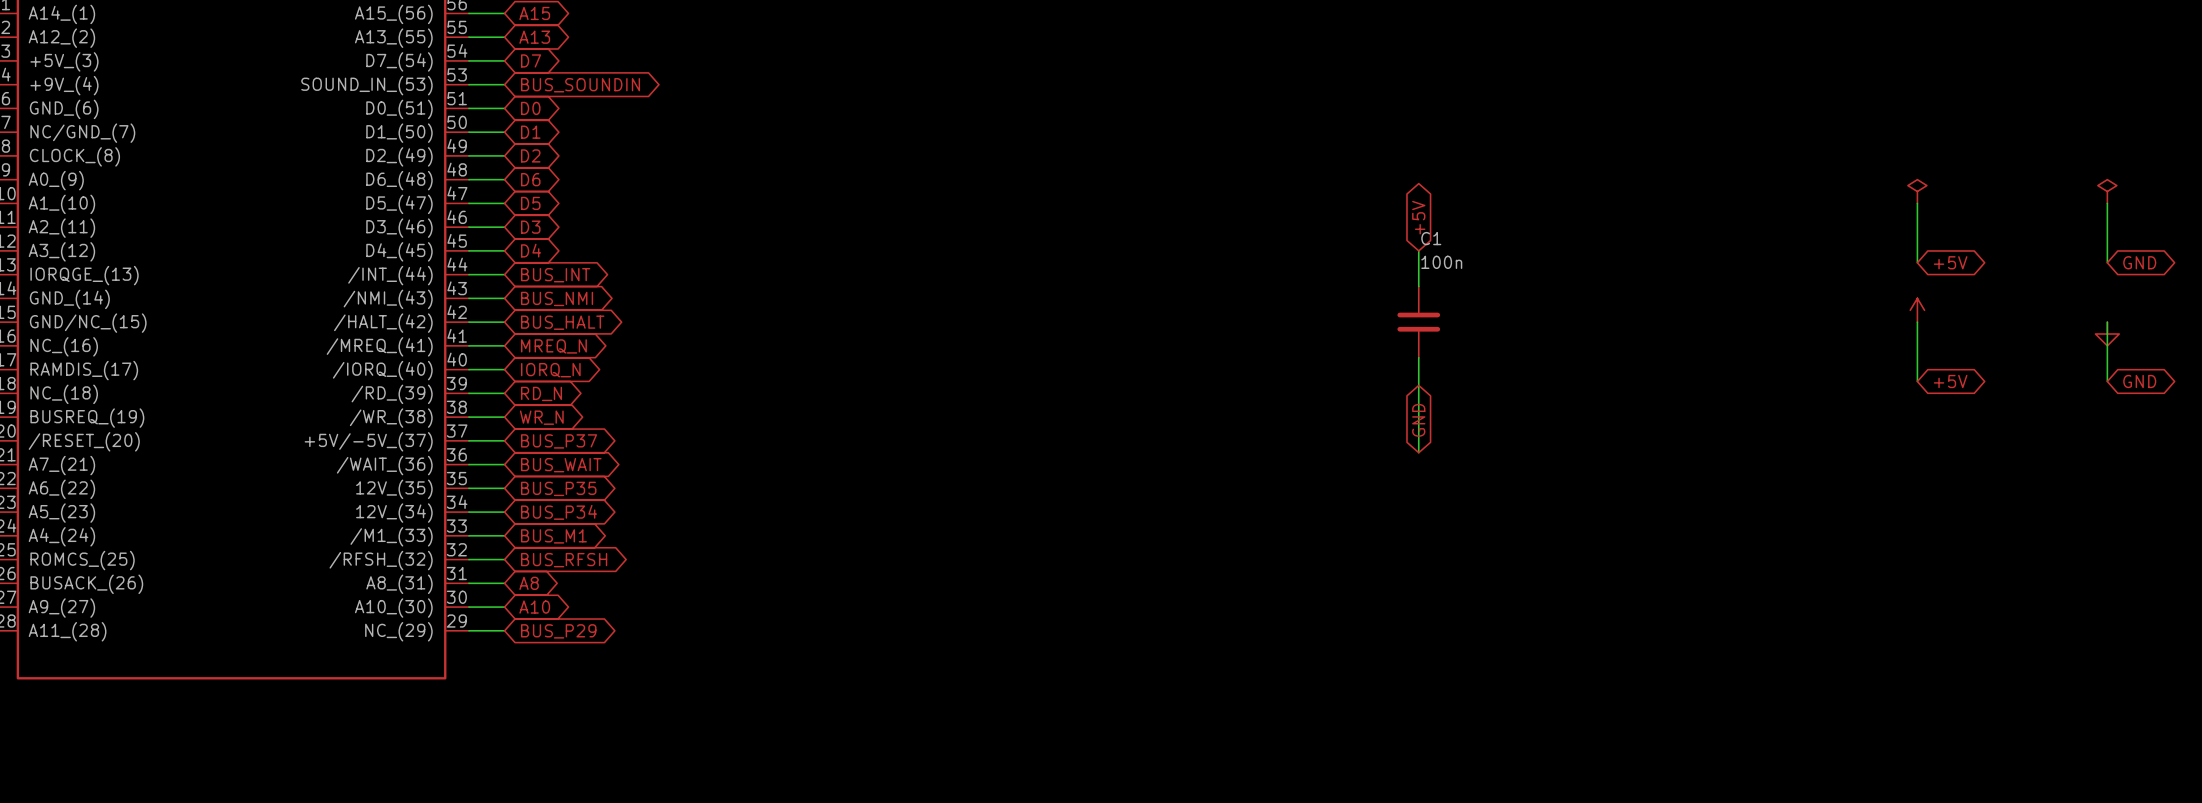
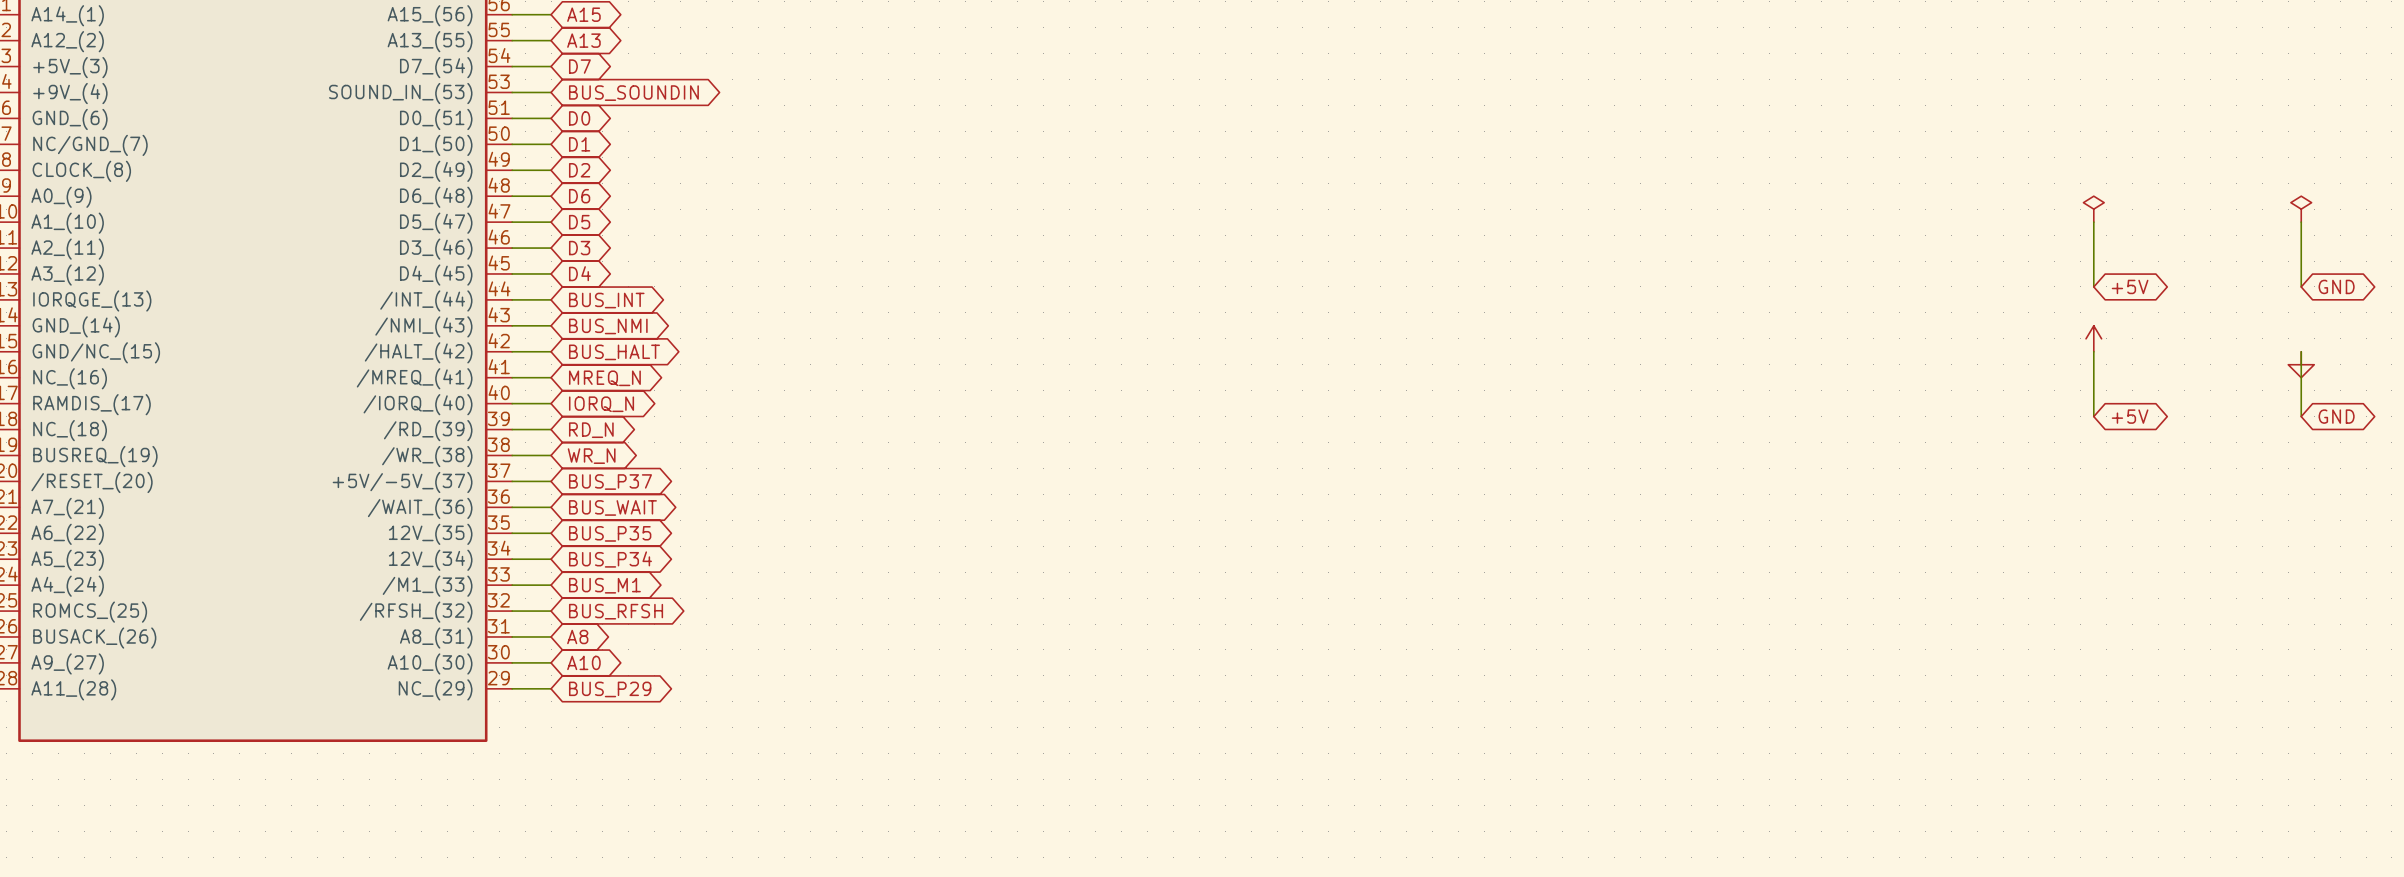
global label: +5V (1418, 217) -> none
wire: (1418, 250) (1418, 286) -> none
C1: 100n (1418, 322) -> none
wire: (1418, 357) (1418, 452) -> none
global label: GND (1418, 420) -> none

